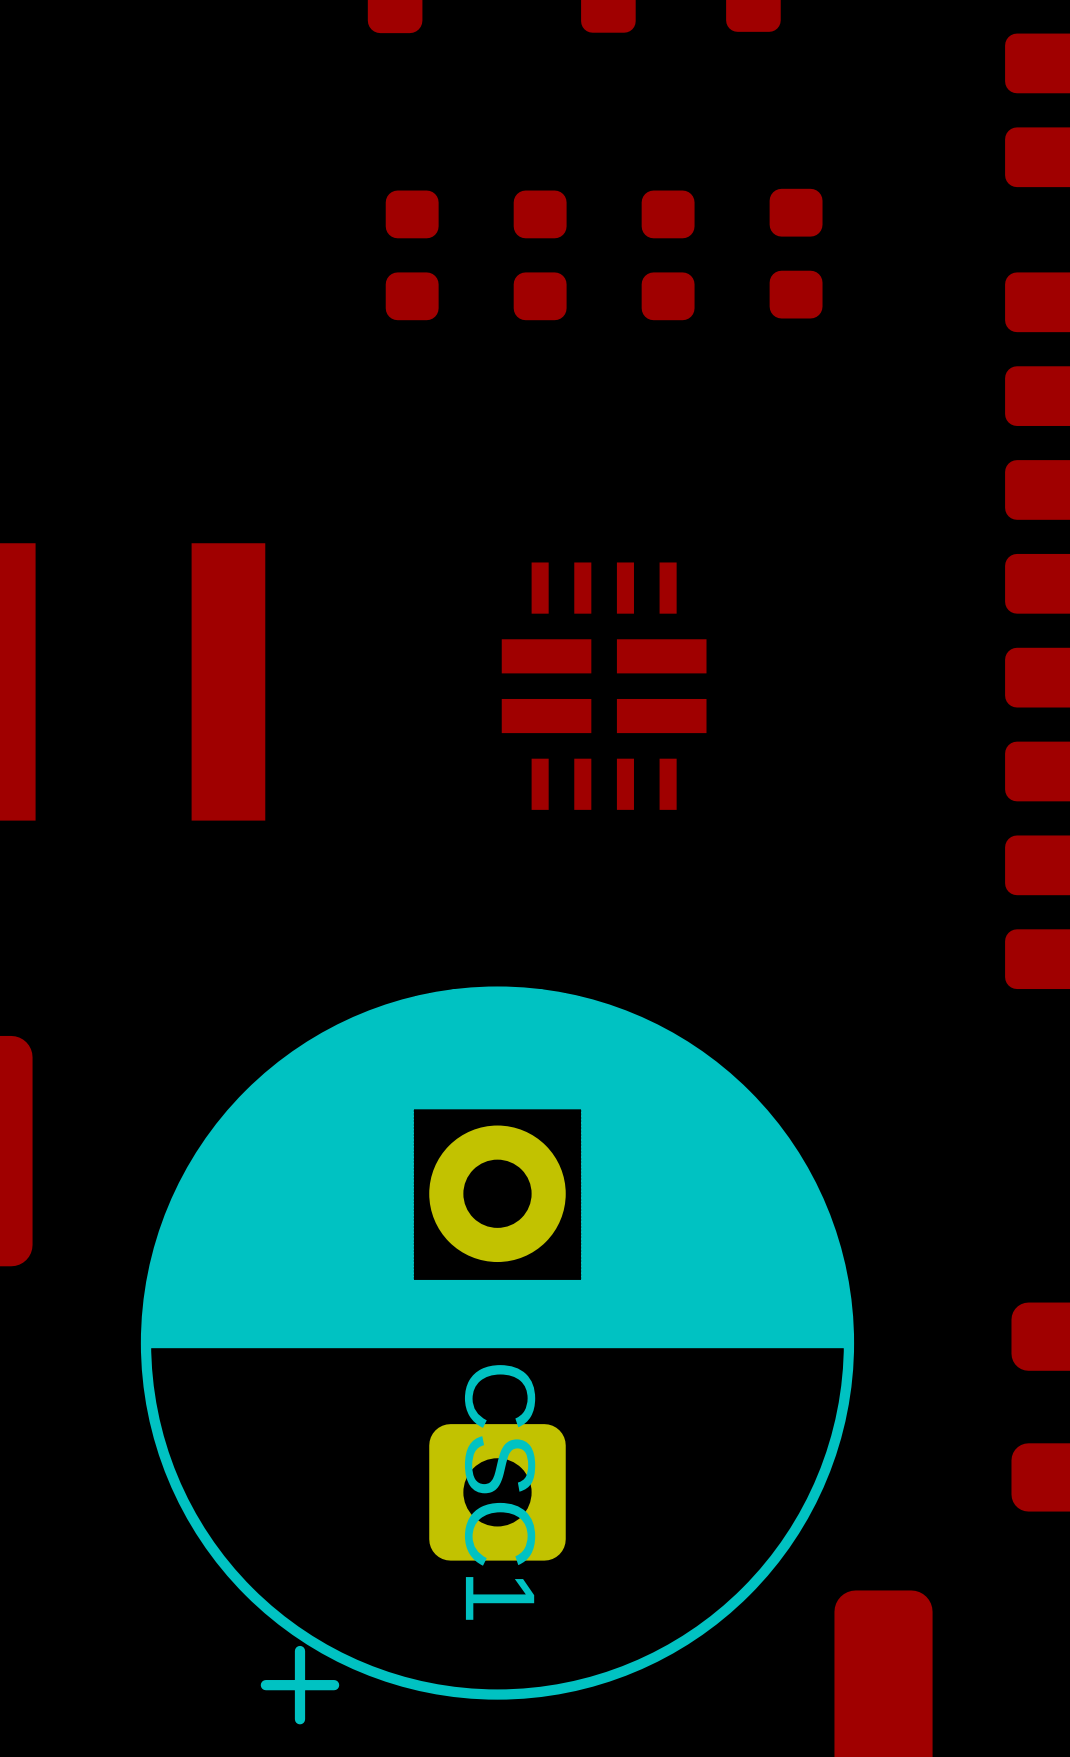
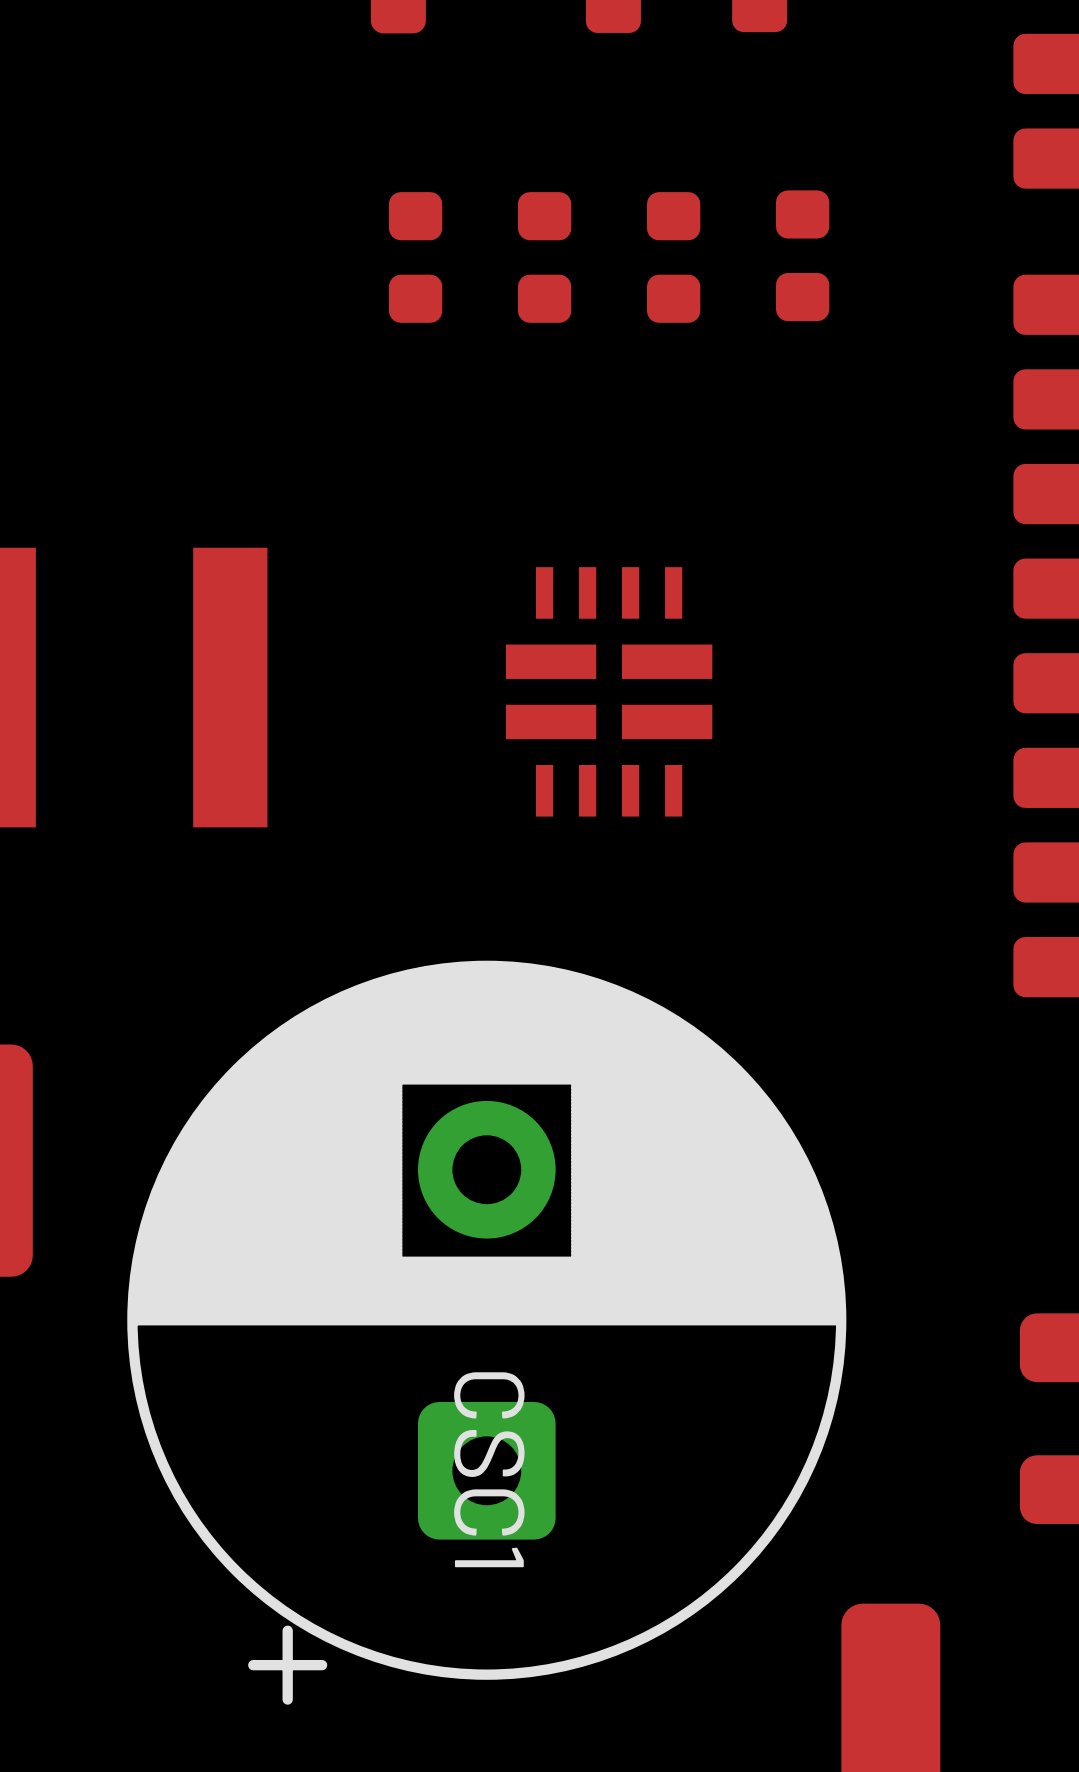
CSC1 position: (497, 1355) -> (486, 1332)

